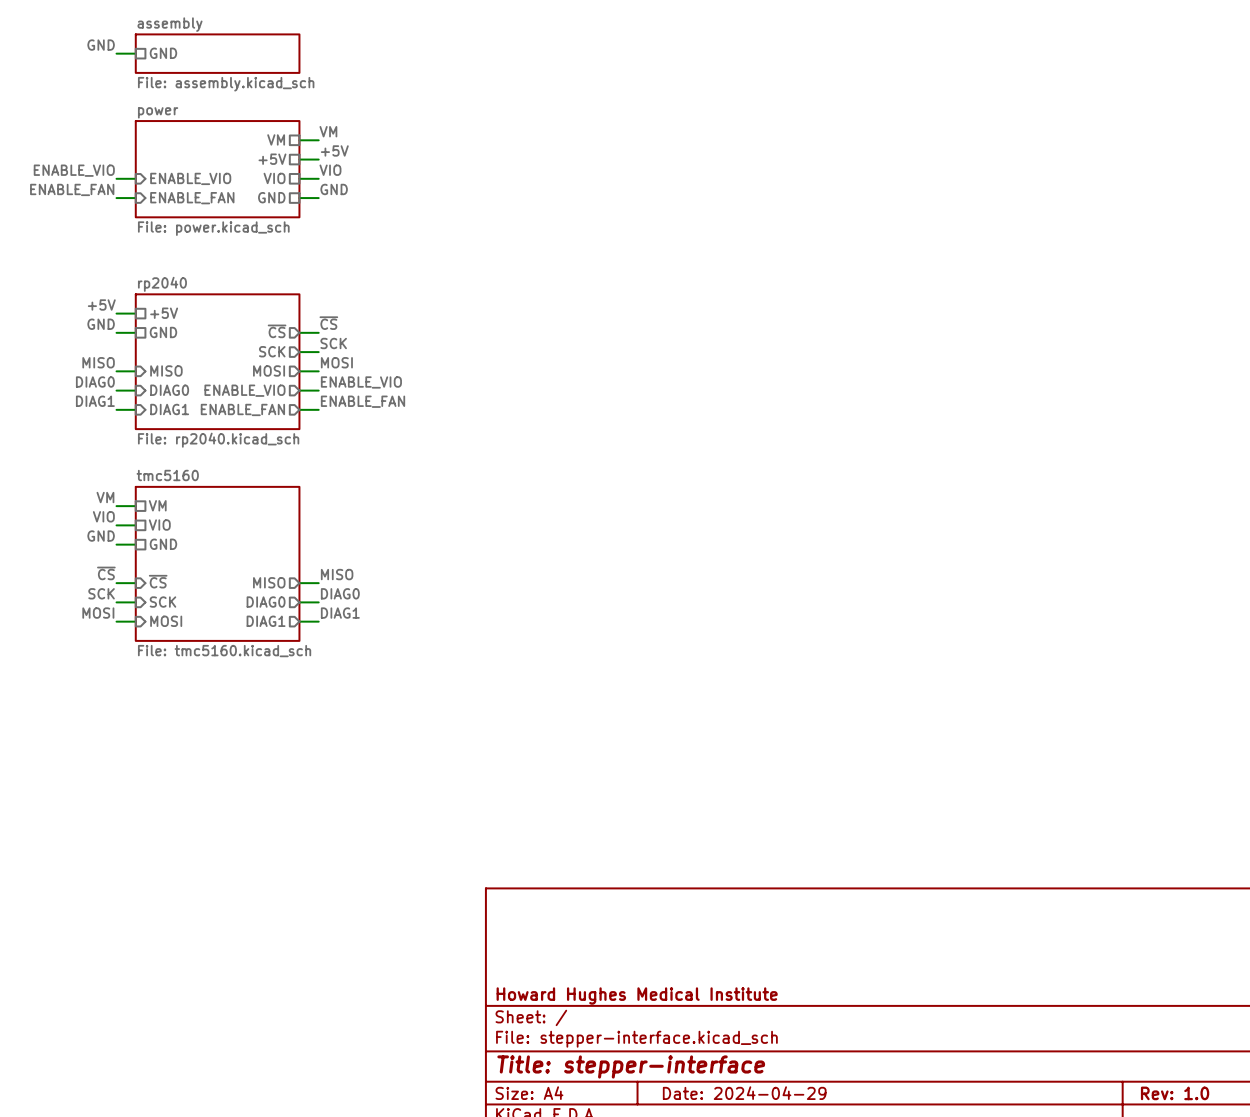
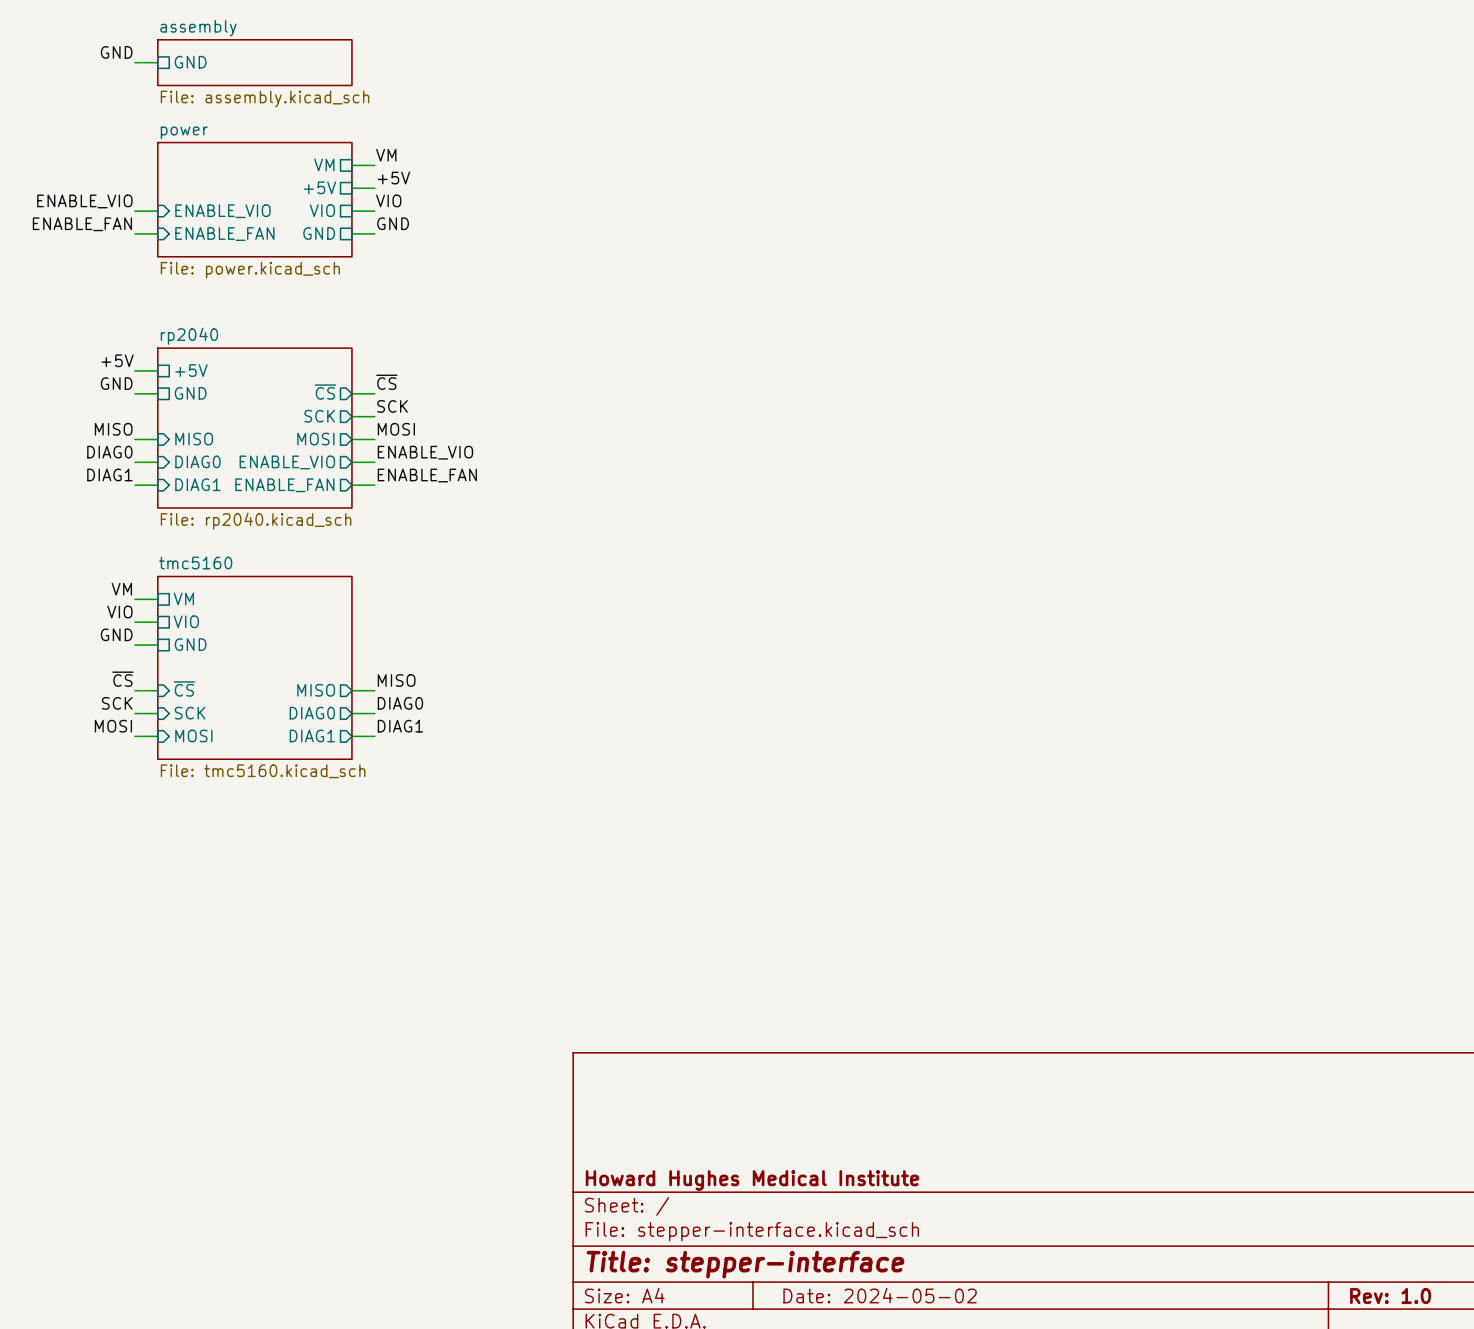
title block: Date: 2024-04-29 (744, 1093) -> Date: 2024-05-02 (880, 1295)

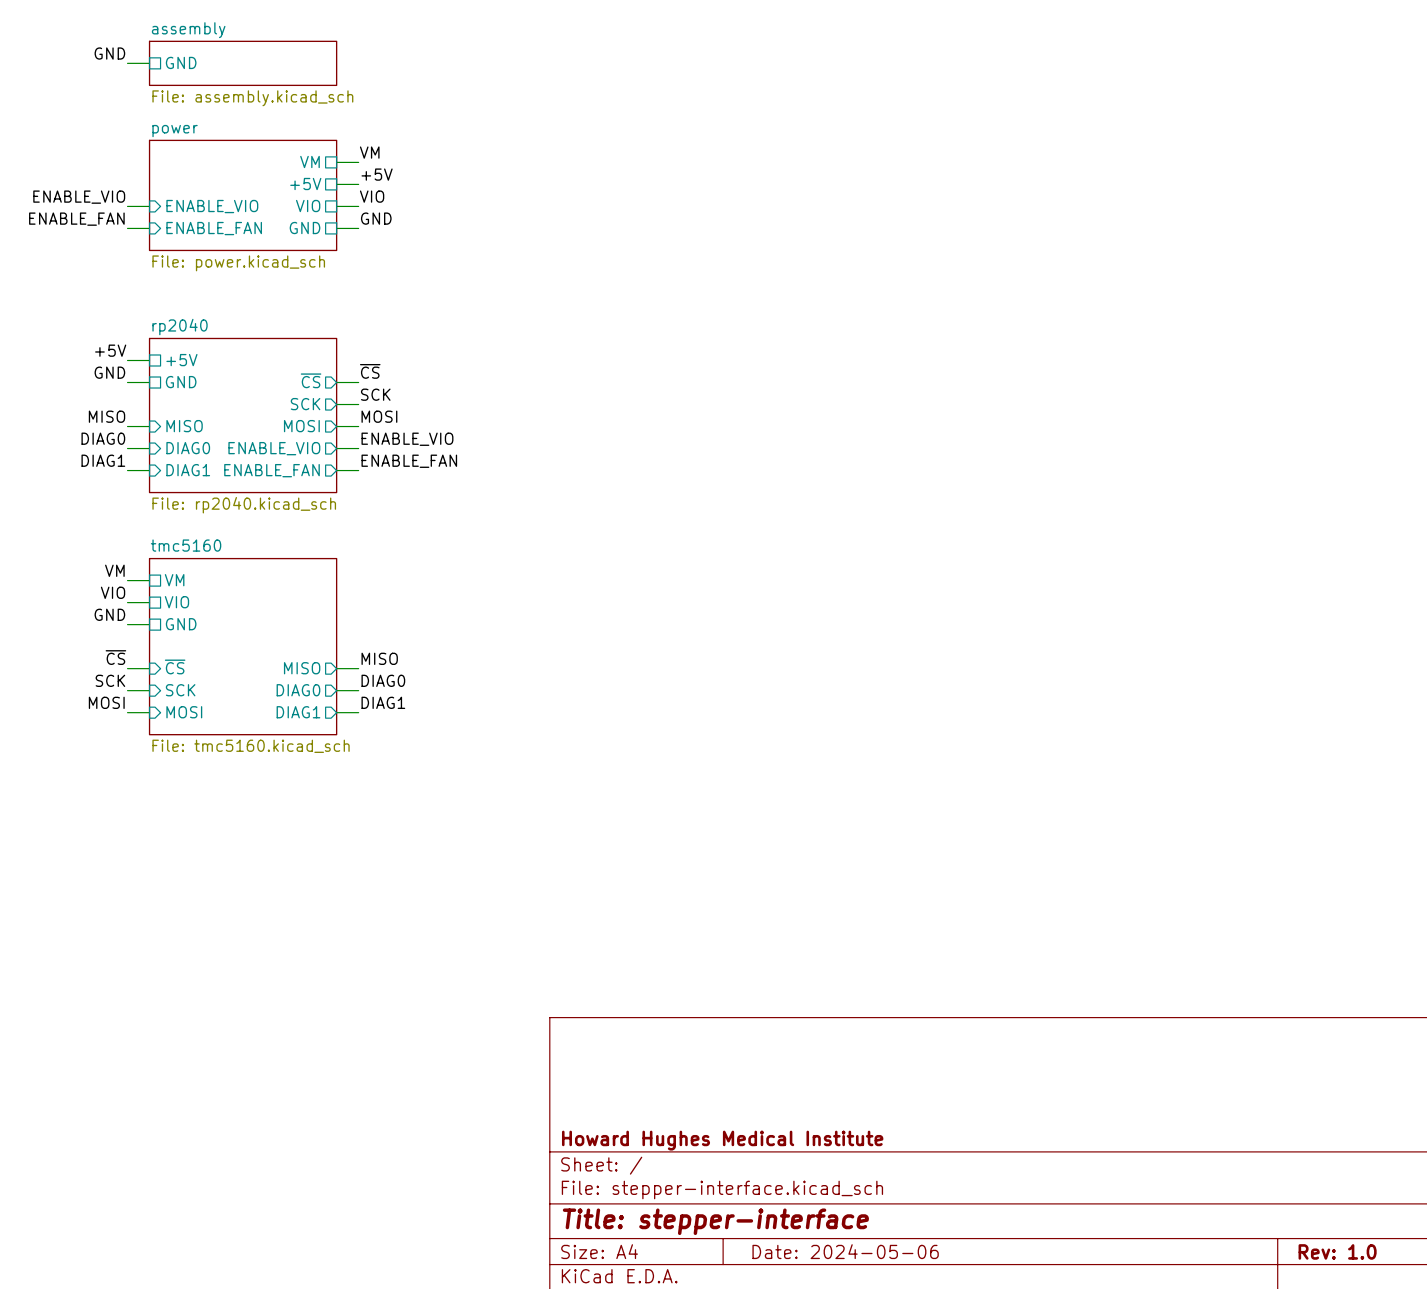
title block: Date: 2024-05-02 (880, 1295) -> Date: 2024-05-06 (845, 1251)

